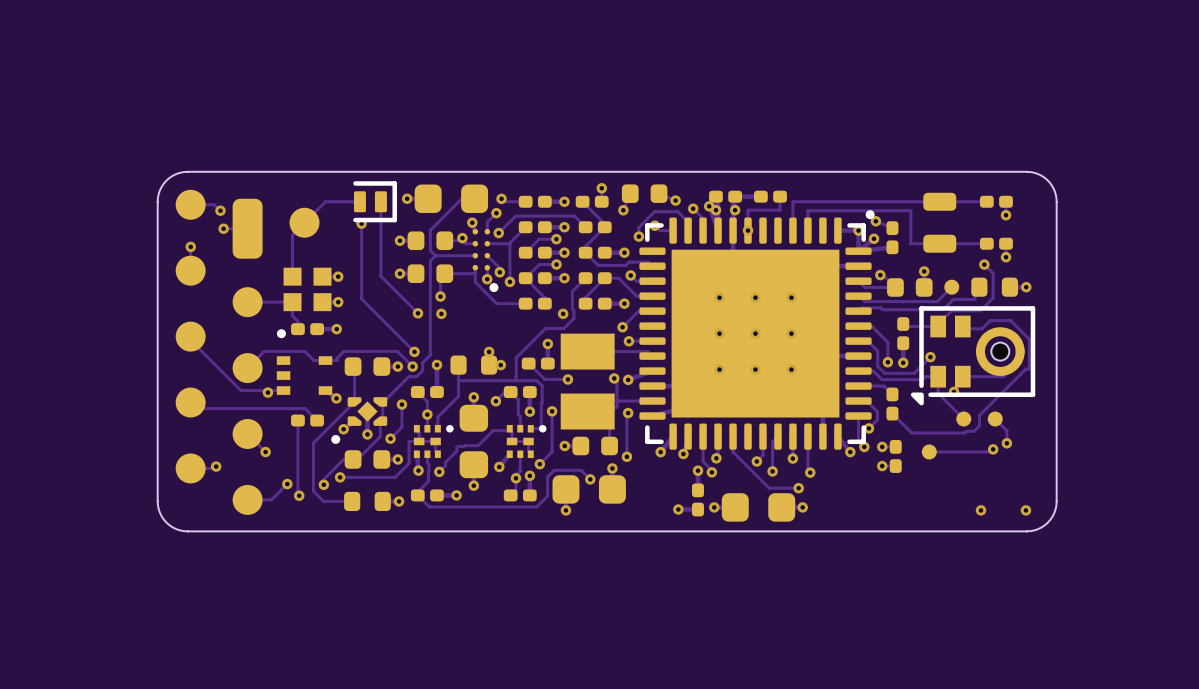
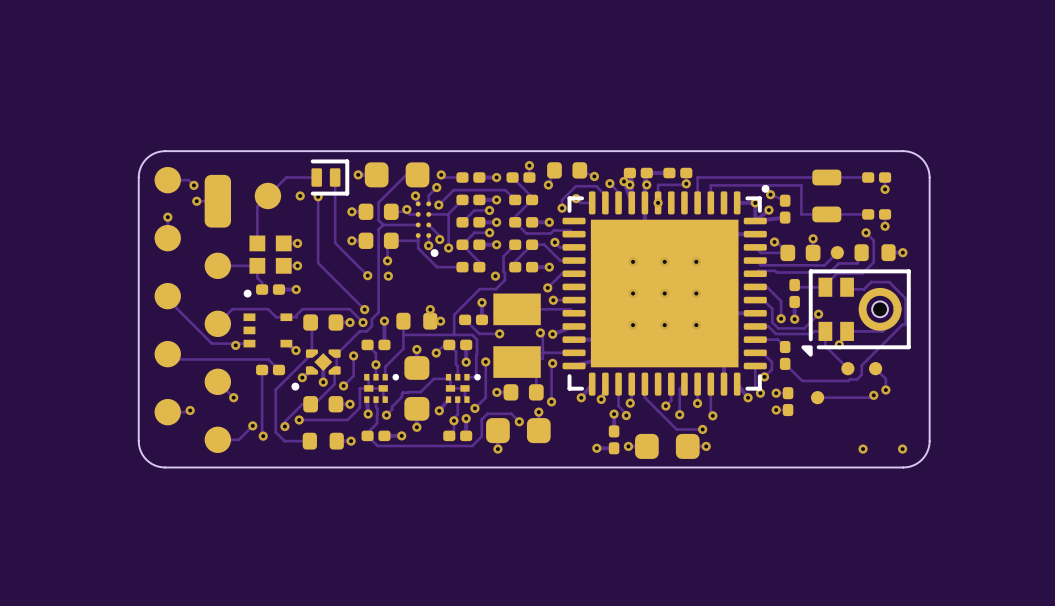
via: none -> (686, 183)
via: none -> (300, 195)

